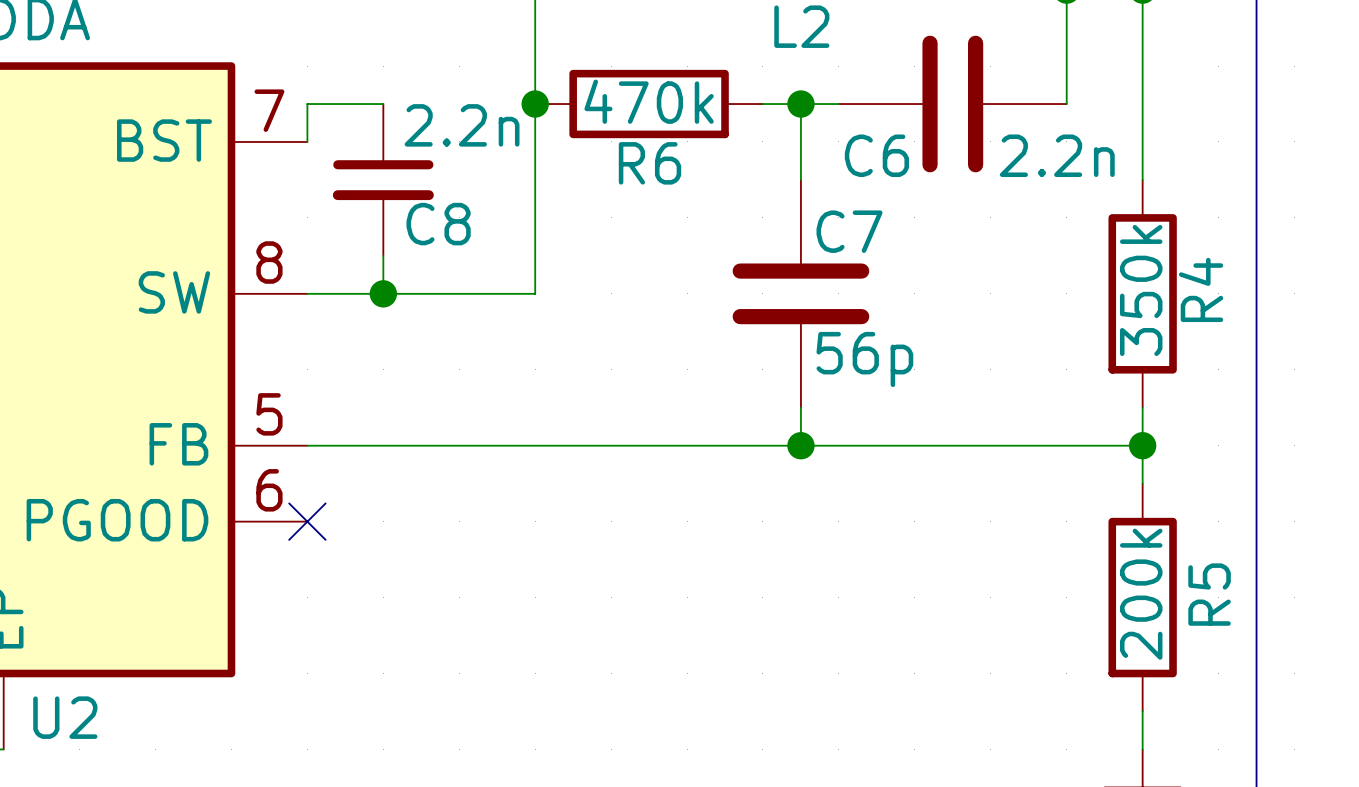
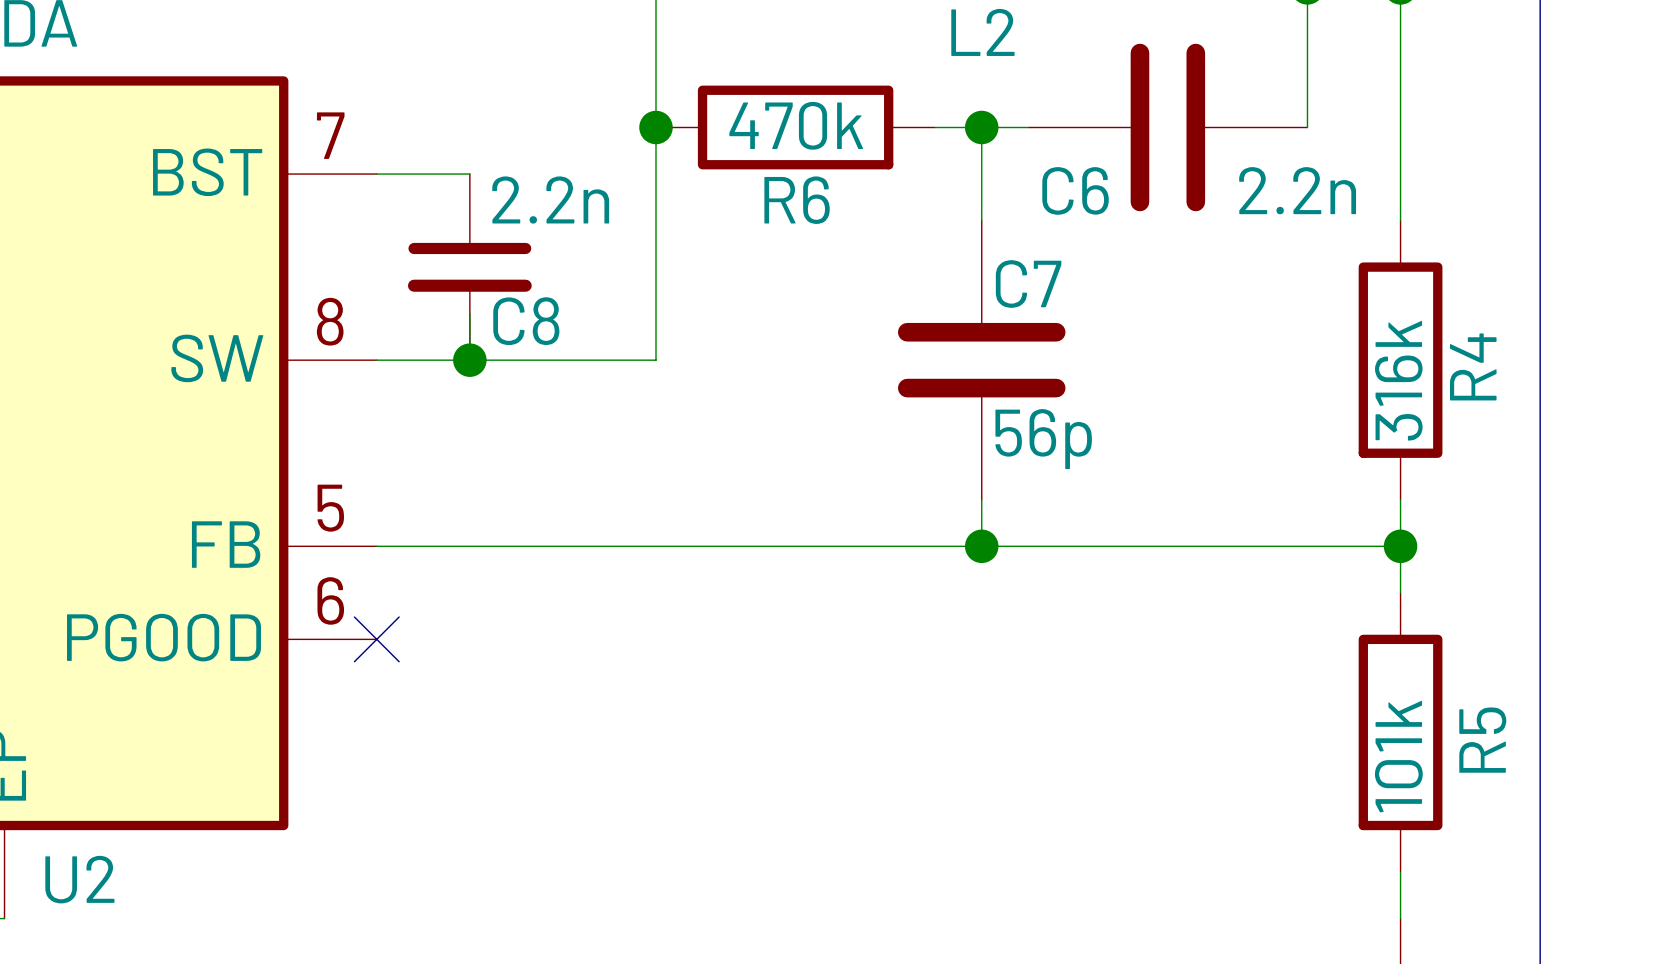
wire: (383, 104) (307, 104) (307, 141) -> (469, 174) (376, 174)
C8 position: (383, 179) -> (469, 267)
R4 value: 350k (1141, 290) -> 316k (1398, 380)
R5 value: 200k (1141, 594) -> 101k (1398, 756)

